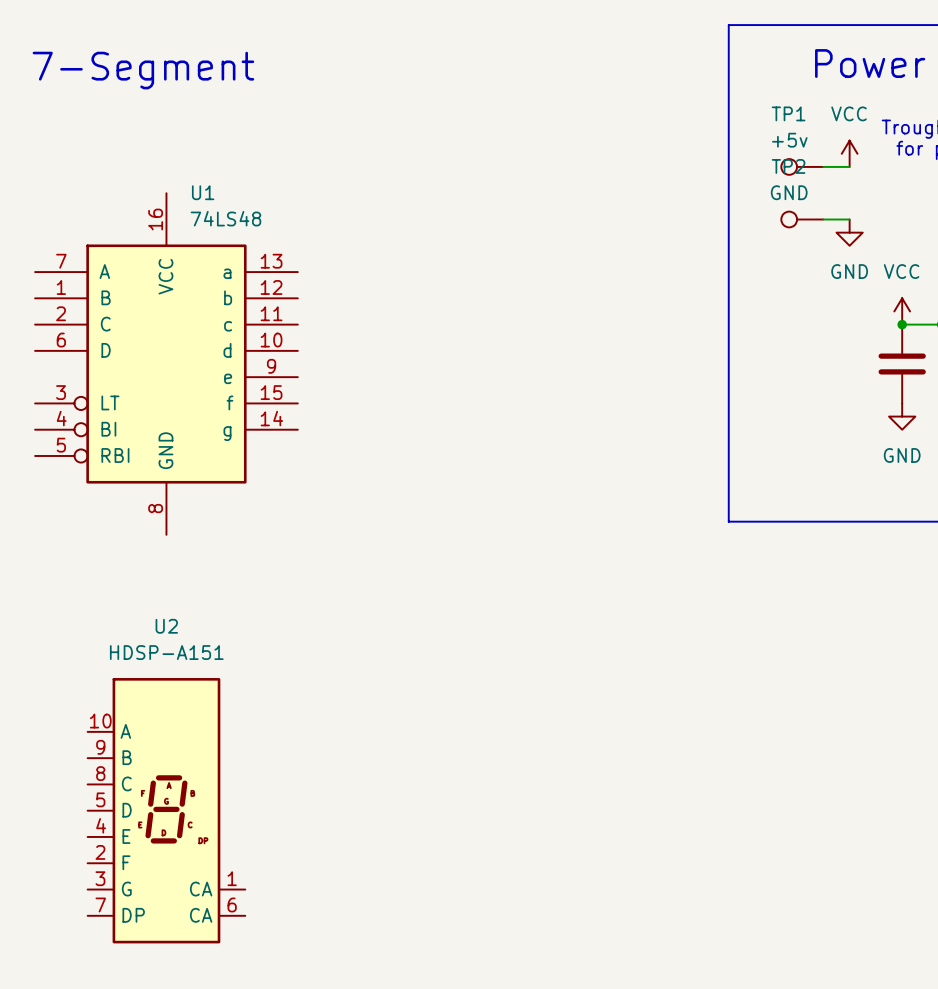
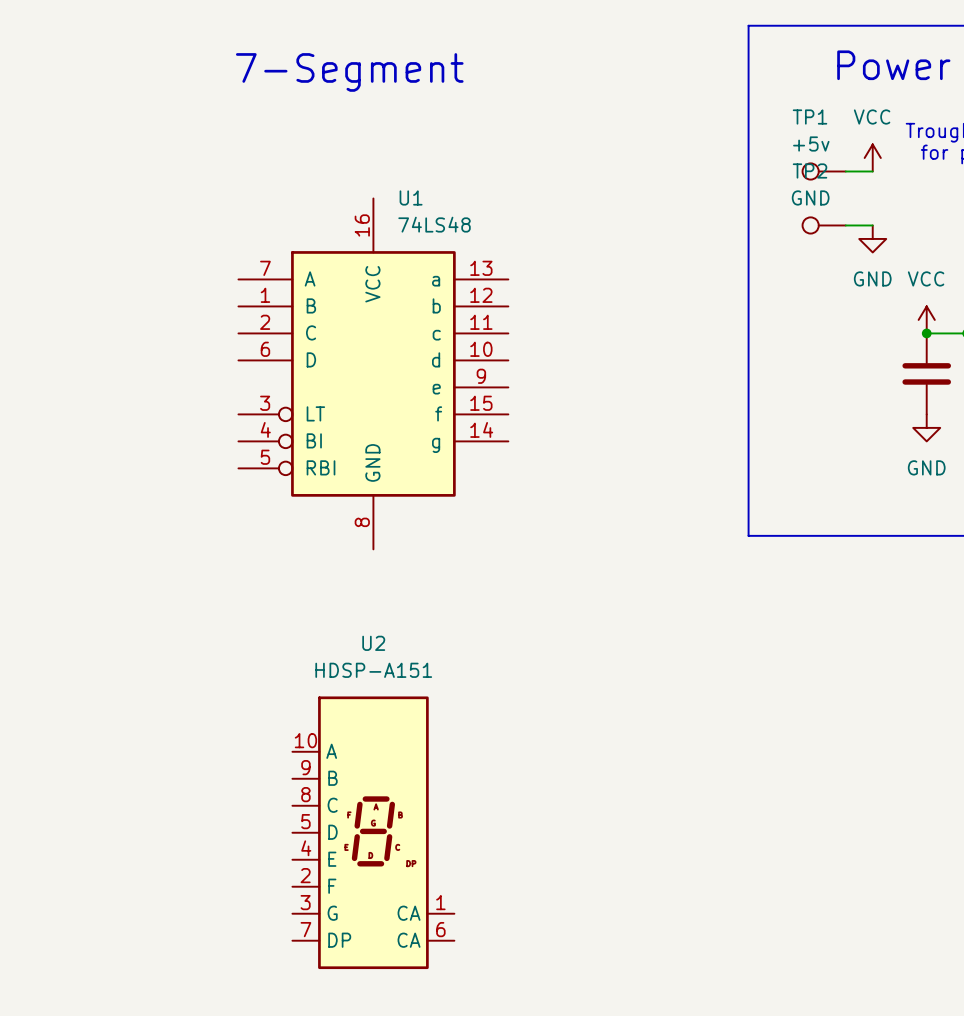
text position: 7-Segment (143, 70) -> 7-Segment (349, 72)
U1 position: (166, 364) -> (373, 373)
U2 position: (166, 810) -> (373, 832)

